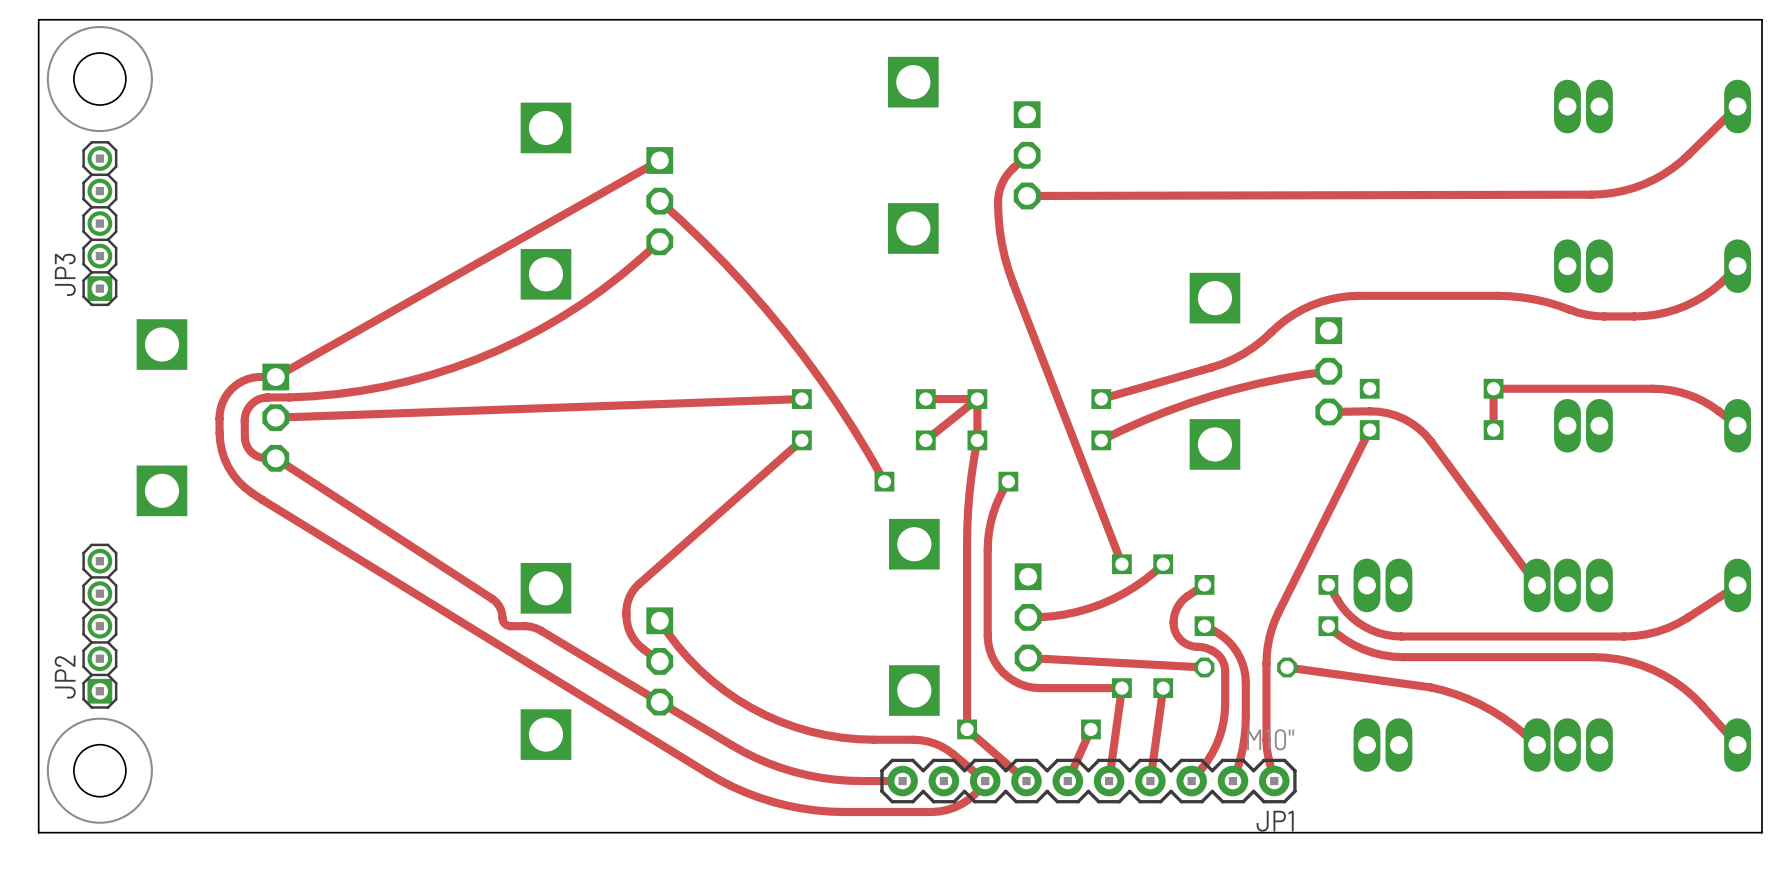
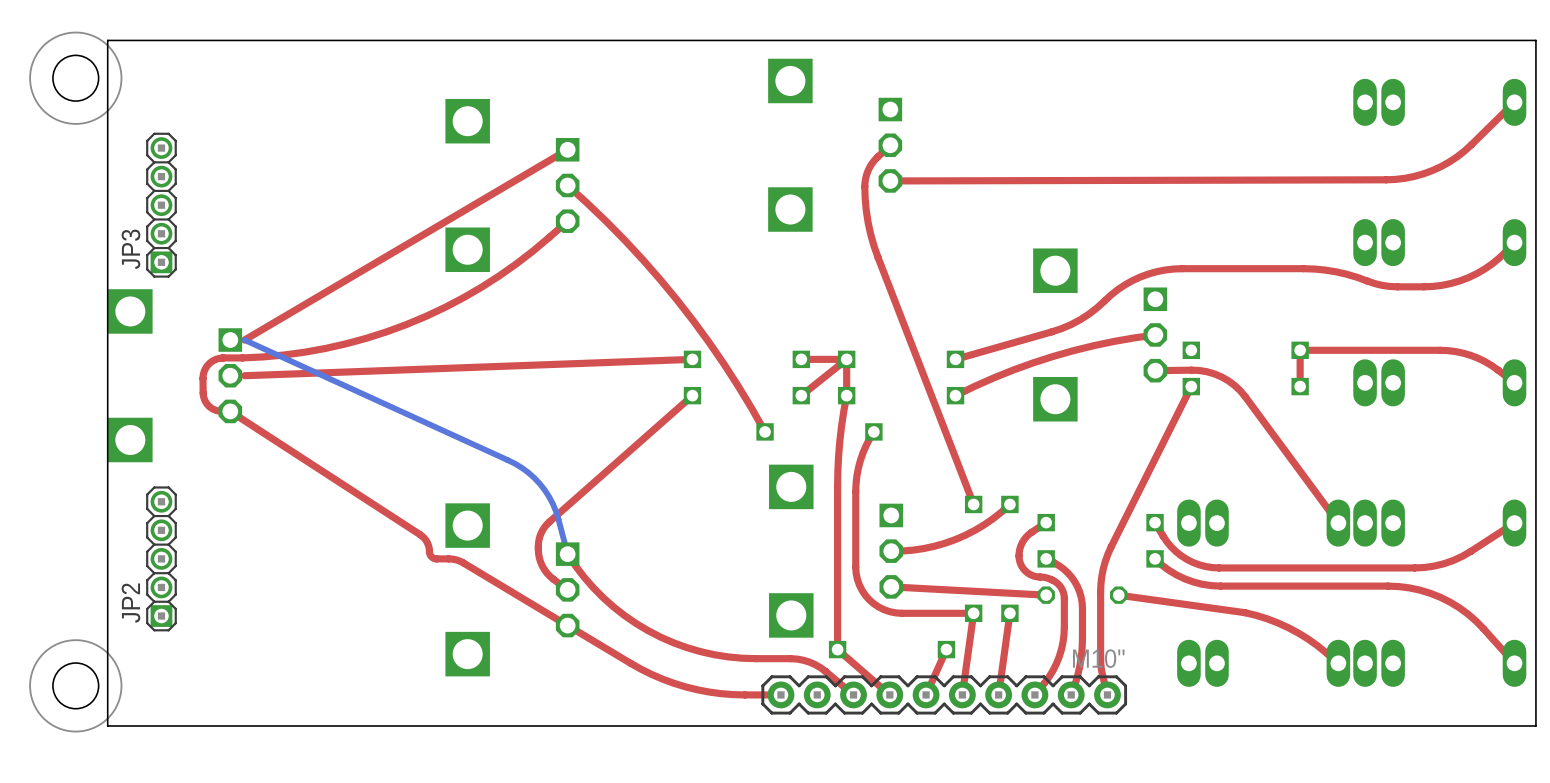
board edge: (1762, 36) (1762, 19) (38, 19) (38, 832) (1762, 832) (1762, 816) -> (1535, 40) (107, 40) (107, 726) (1535, 726)
top track: (659, 160) (275, 377) (251, 377) (235, 385) (225, 396) (219, 413) (220, 441) (228, 467) (245, 487) (262, 499) (708, 773) (746, 792) (773, 802) (816, 810) (931, 812) (947, 809) (962, 803) (975, 793) (985, 781) -> (567, 149) (244, 340)
JP3 position: (99, 223) -> (161, 205)
bottom track: none -> (244, 340) (521, 467) (539, 483) (549, 496) (556, 511) (567, 554)
top track: (801, 399) (275, 417) -> (692, 359) (244, 375)
JP2 position: (99, 626) -> (161, 558)
JP1 name: JP1 (1275, 821) -> none

